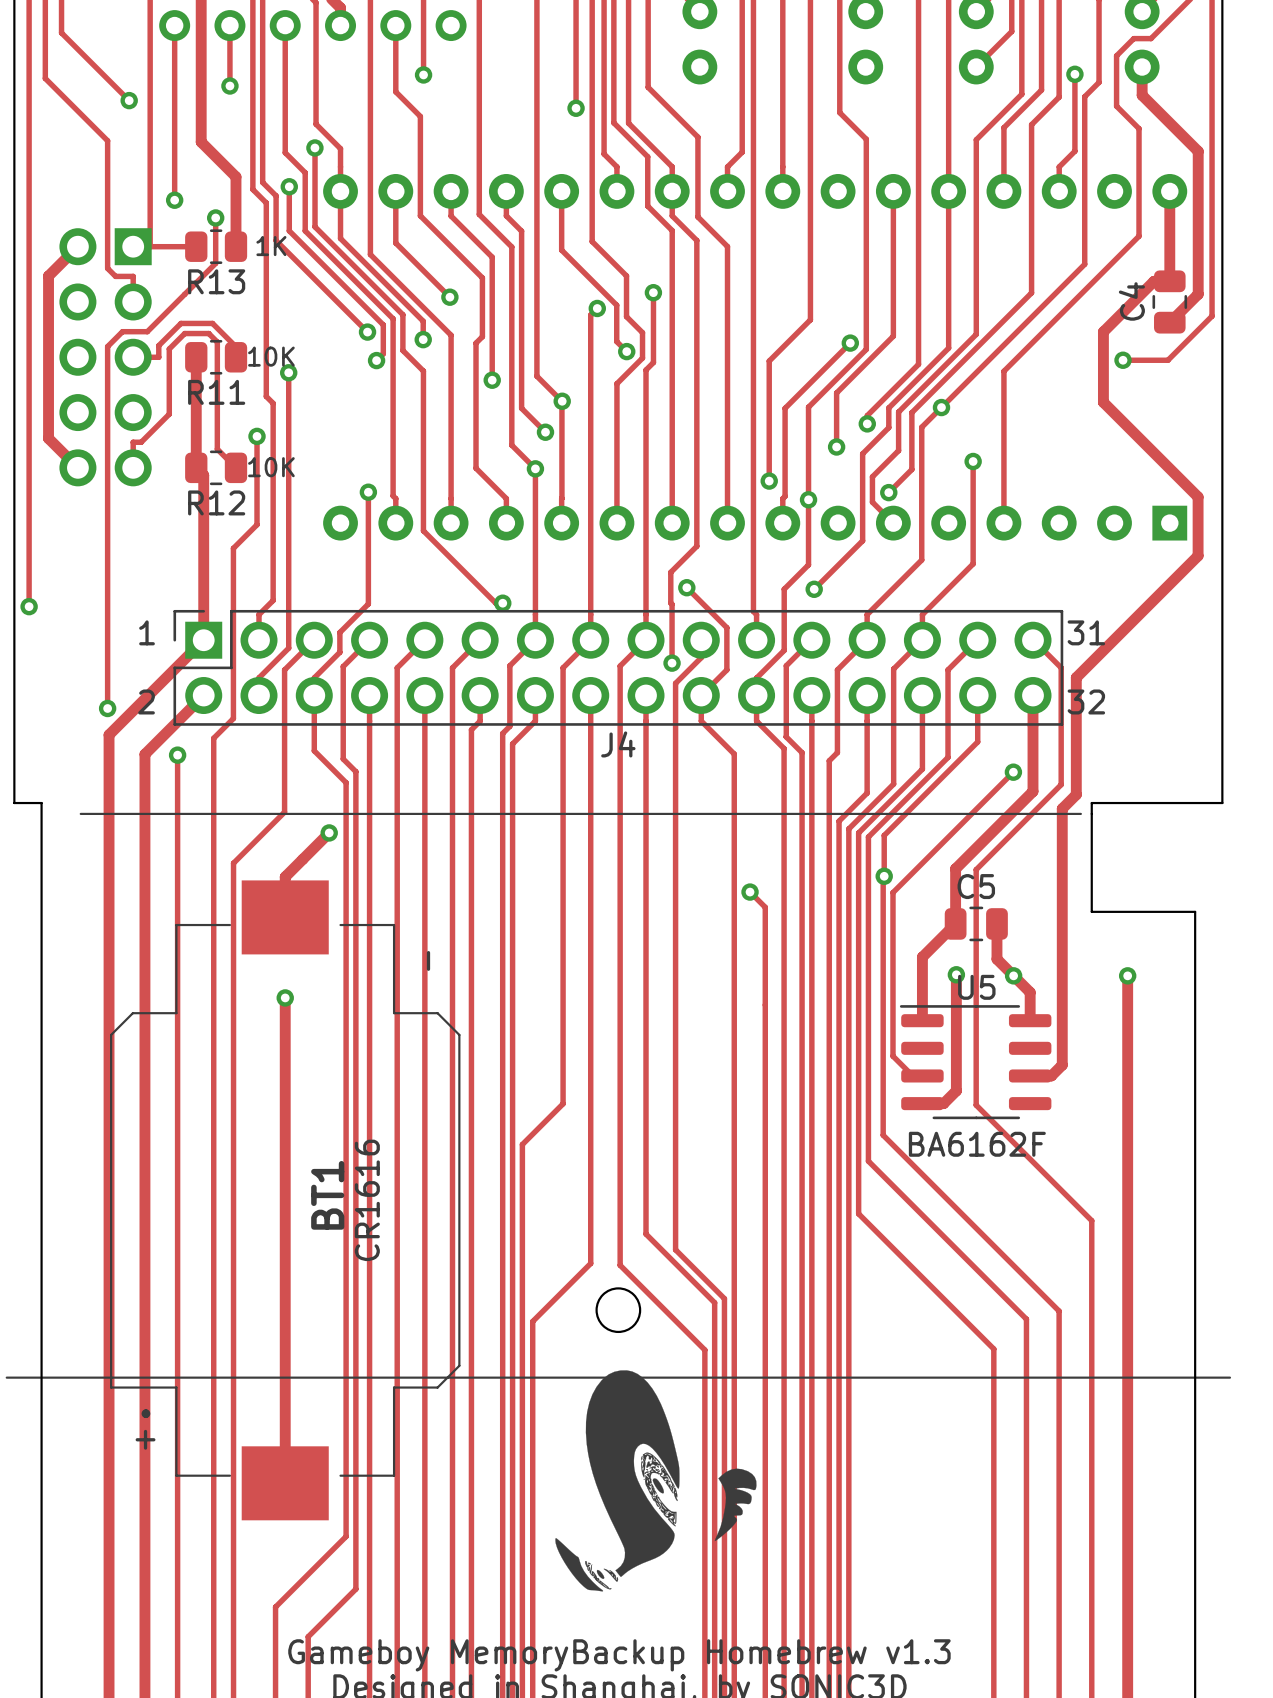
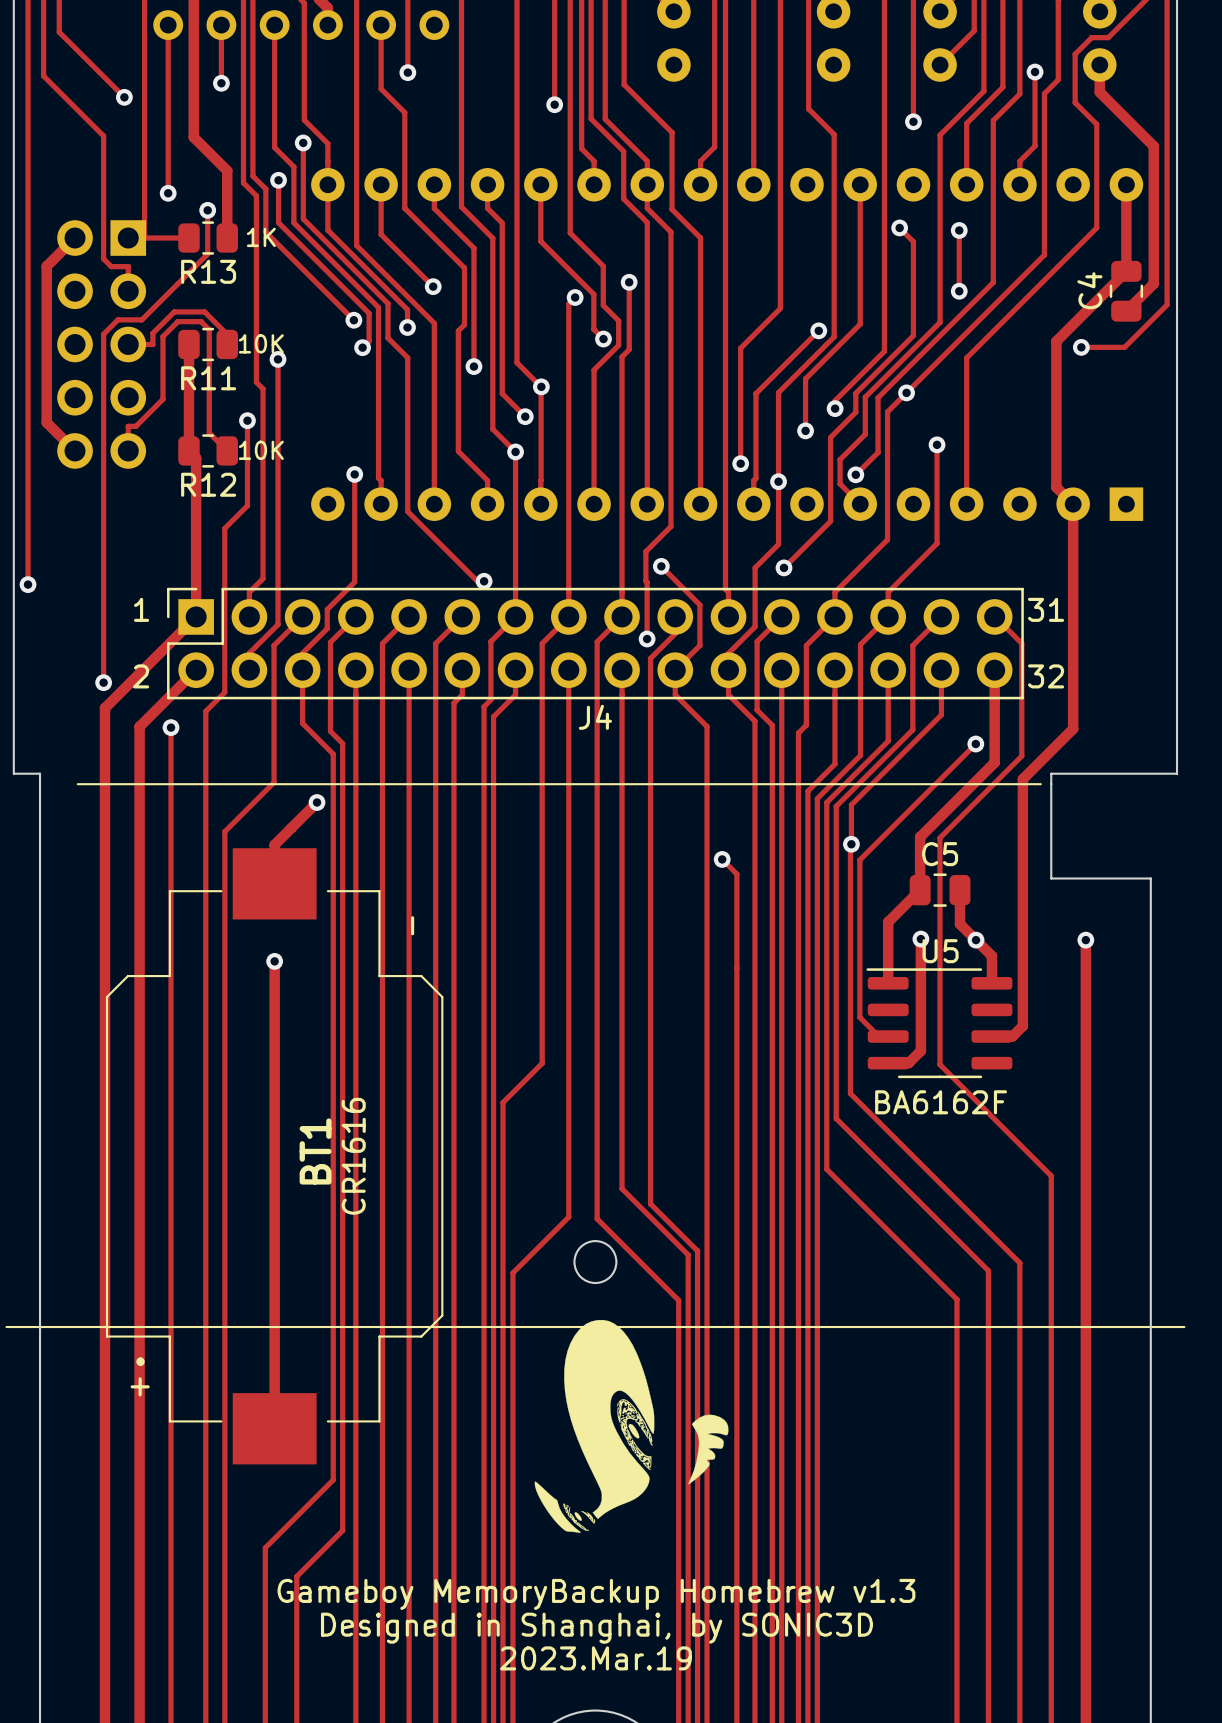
track: (948, 126) (948, 250) -> (899, 227) (913, 241)
via: none -> (913, 121)
via: none -> (899, 227)
track: none -> (959, 230) (959, 291)
via: none -> (959, 230)
track: (1169, 281) (1154, 281) (1103, 331) (1103, 402) (1198, 497) (1198, 555) (1076, 677) (1076, 794) -> (1126, 271) (1056, 341) (1056, 487) (1073, 504) (1073, 728) (1036, 765)
via: none -> (959, 291)

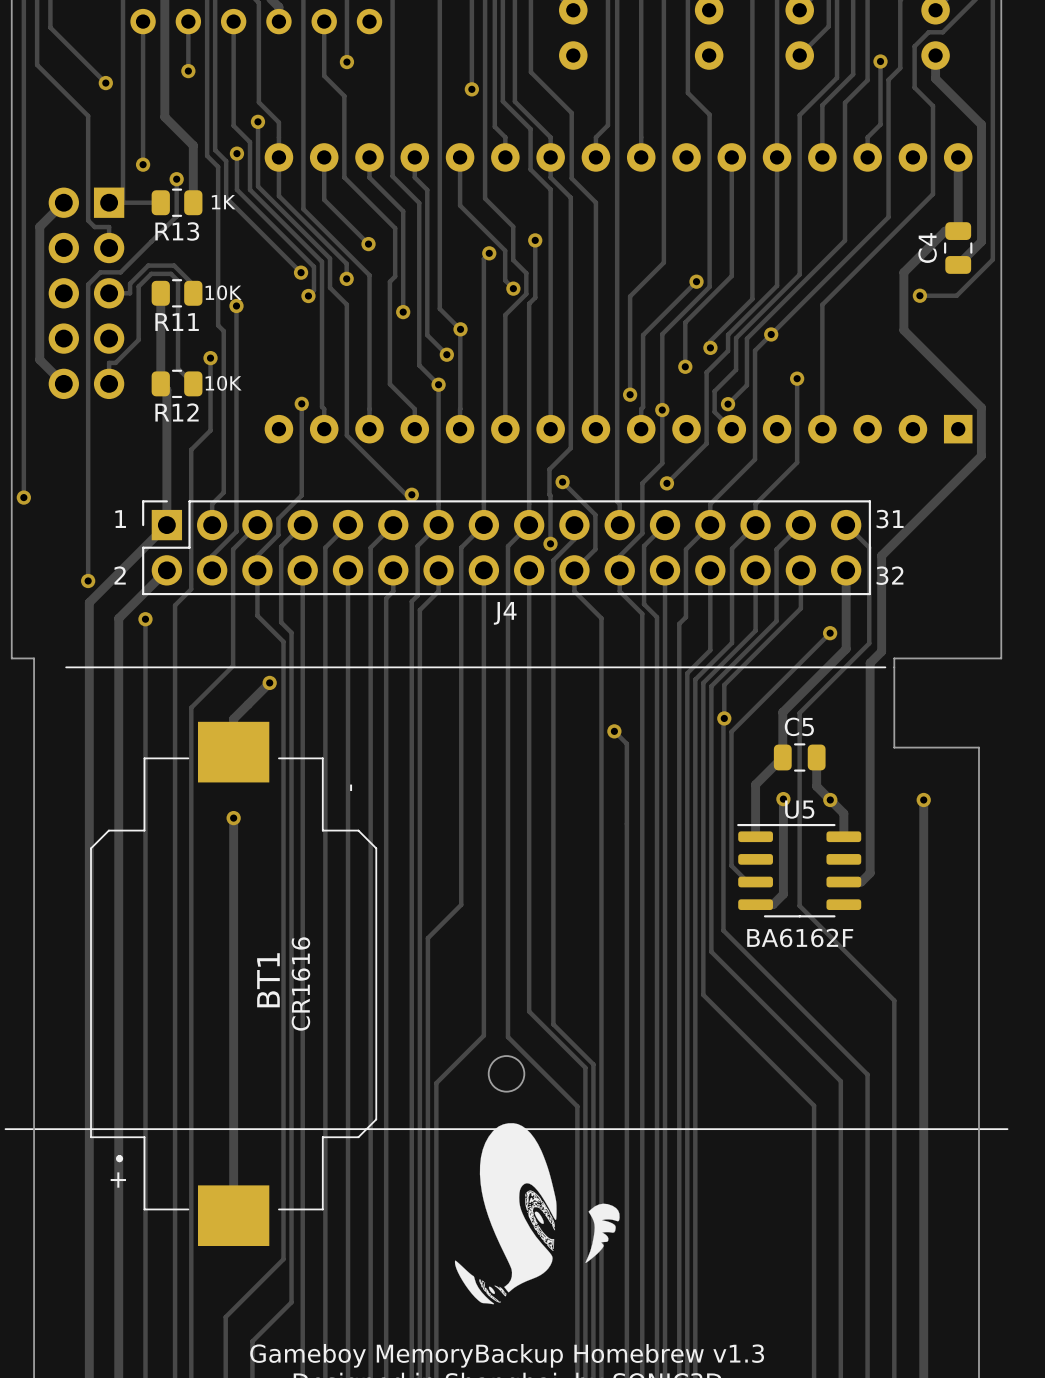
via: (913, 121) -> none
track: (899, 227) (913, 241) -> (777, 103) (777, 205)
via: (899, 227) -> none
track: (959, 230) (959, 291) -> none
via: (959, 230) -> none
track: (1126, 271) (1056, 341) (1056, 487) (1073, 504) (1073, 728) (1036, 765) -> (958, 231) (945, 231) (903, 272) (903, 330) (981, 407) (981, 455) (881, 555) (881, 651)
via: (959, 291) -> none

